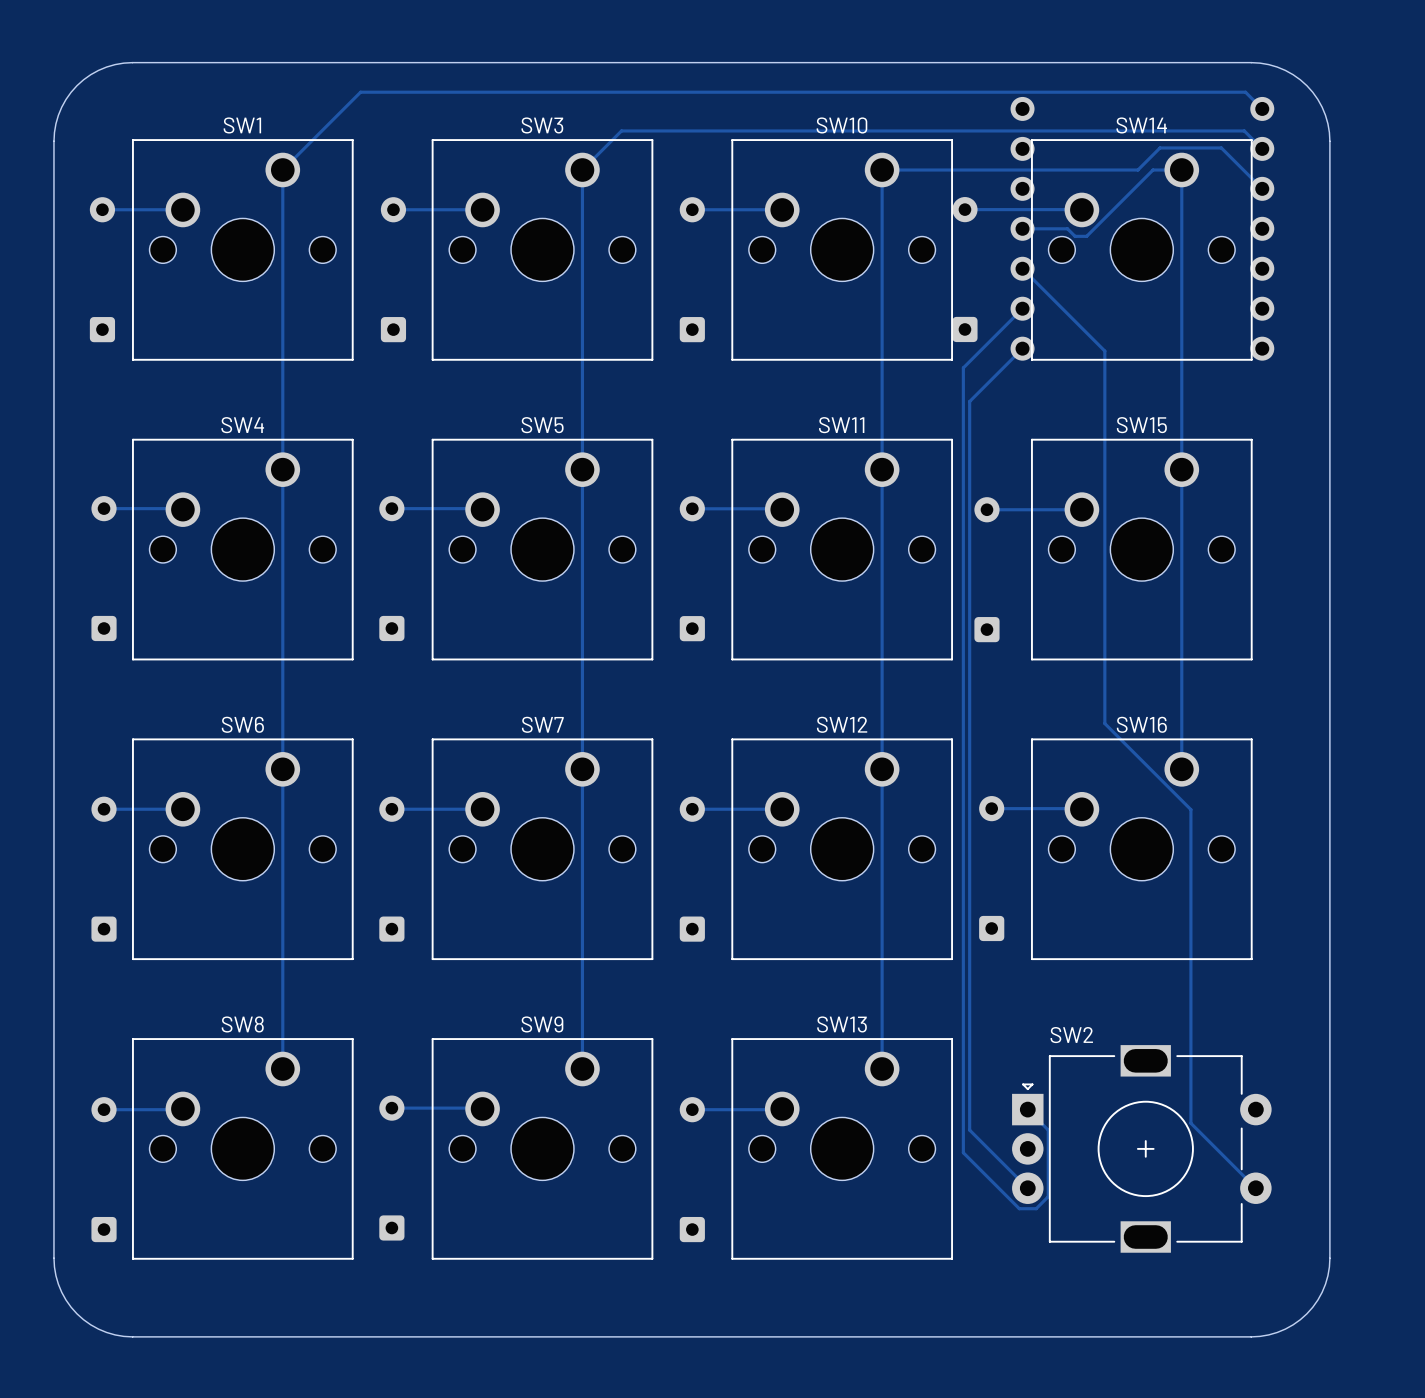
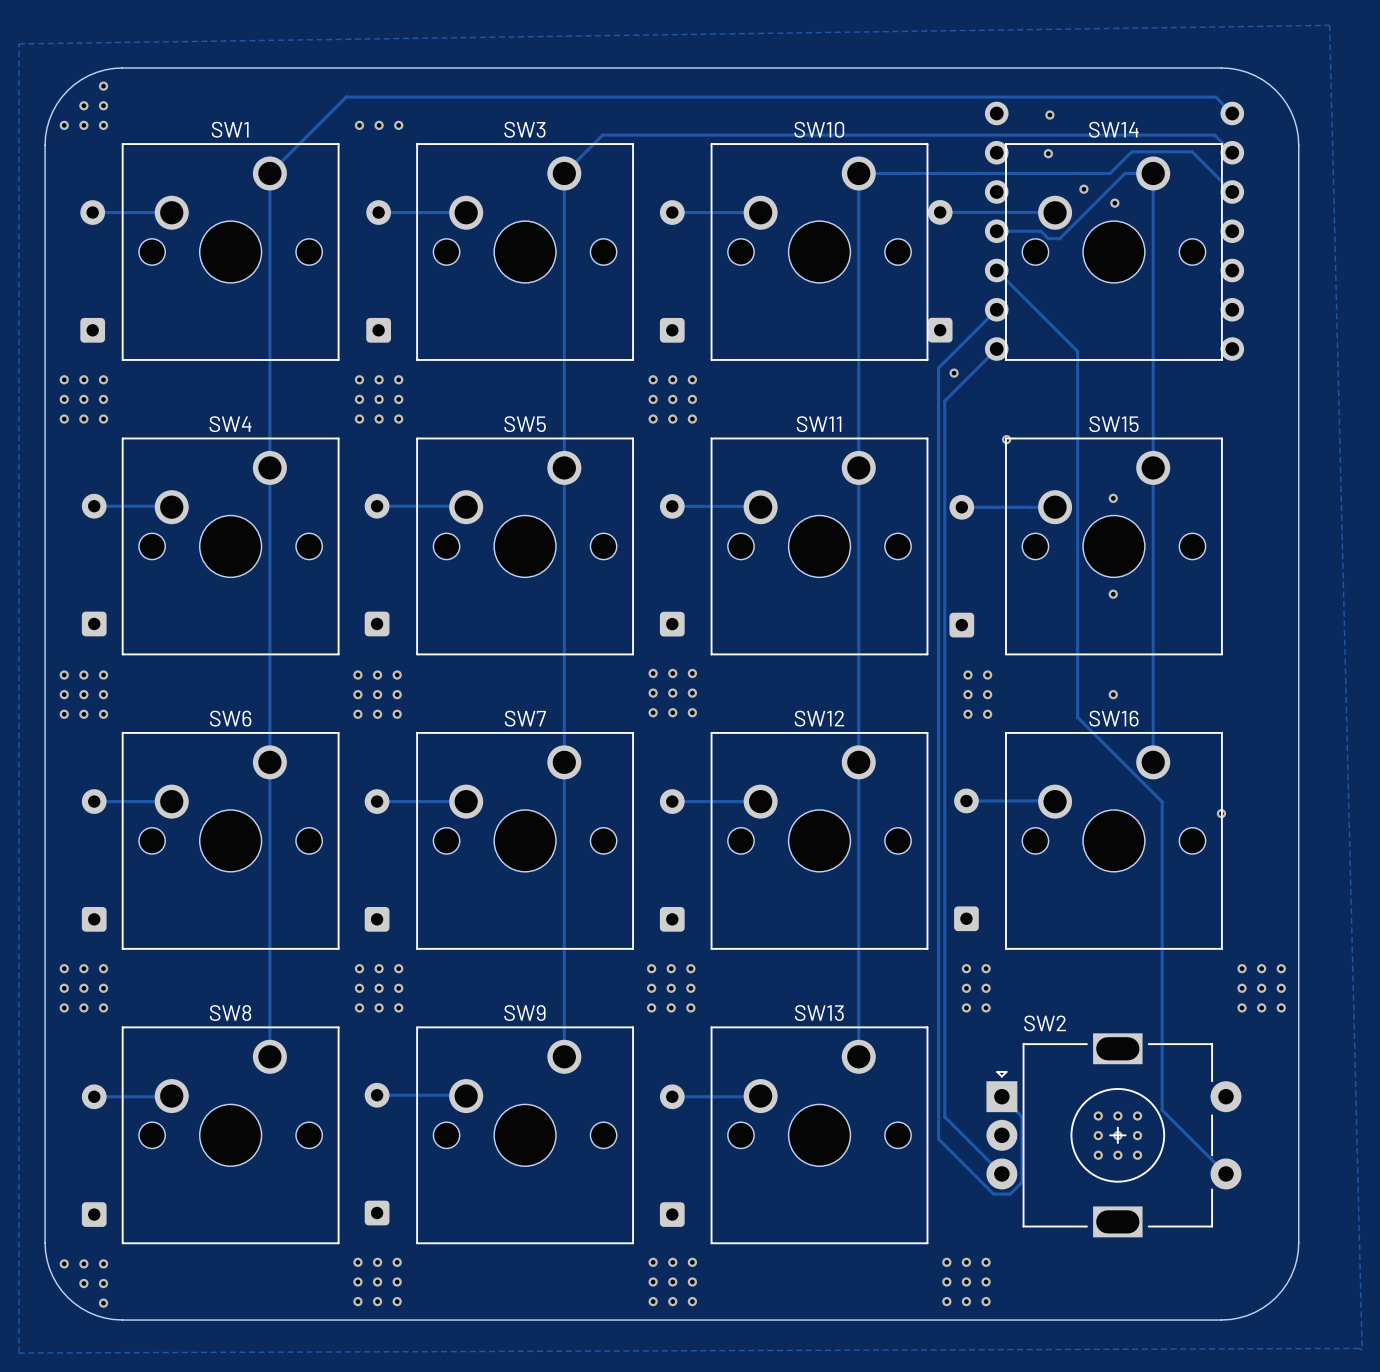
zone outline: none -> (1329, 25) (18, 43) (18, 1353) (1359, 1348) (1362, 1349) (1329, 25)
via: none -> (103, 86)
via: none -> (83, 105)
via: none -> (103, 105)
via: none -> (1049, 115)
via: none -> (64, 125)
via: none -> (83, 125)
via: none -> (103, 125)
via: none -> (359, 125)
via: none -> (379, 125)
via: none -> (398, 125)
via: none -> (1048, 153)
via: none -> (1083, 189)
via: none -> (1114, 203)
via: none -> (954, 373)
via: none -> (64, 379)
via: none -> (83, 379)
via: none -> (103, 379)
via: none -> (359, 379)
via: none -> (379, 379)
via: none -> (398, 379)
via: none -> (653, 379)
via: none -> (672, 379)
via: none -> (692, 379)
via: none -> (64, 399)
via: none -> (83, 399)
via: none -> (103, 399)
via: none -> (359, 399)
via: none -> (379, 399)
via: none -> (398, 399)
via: none -> (653, 399)
via: none -> (672, 399)
via: none -> (692, 399)
via: none -> (64, 419)
via: none -> (83, 419)
via: none -> (103, 419)
via: none -> (359, 419)
via: none -> (379, 419)
via: none -> (398, 419)
via: none -> (653, 419)
via: none -> (672, 419)
via: none -> (692, 419)
via: none -> (1006, 439)
via: none -> (1113, 498)
via: none -> (1113, 594)
via: none -> (653, 673)
via: none -> (672, 673)
via: none -> (692, 673)
via: none -> (64, 675)
via: none -> (83, 675)
via: none -> (103, 675)
via: none -> (357, 675)
via: none -> (377, 675)
via: none -> (397, 675)
via: none -> (967, 675)
via: none -> (987, 675)
via: none -> (653, 693)
via: none -> (672, 693)
via: none -> (692, 693)
via: none -> (64, 694)
via: none -> (83, 694)
via: none -> (103, 694)
via: none -> (357, 694)
via: none -> (377, 694)
via: none -> (397, 694)
via: none -> (967, 694)
via: none -> (987, 694)
via: none -> (1113, 694)
via: none -> (653, 712)
via: none -> (672, 712)
via: none -> (692, 712)
via: none -> (64, 714)
via: none -> (83, 714)
via: none -> (103, 714)
via: none -> (357, 714)
via: none -> (377, 714)
via: none -> (397, 714)
via: none -> (967, 714)
via: none -> (987, 714)
via: none -> (1221, 813)
via: none -> (64, 968)
via: none -> (83, 968)
via: none -> (103, 968)
via: none -> (359, 968)
via: none -> (379, 968)
via: none -> (398, 968)
via: none -> (651, 968)
via: none -> (671, 968)
via: none -> (690, 968)
via: none -> (966, 968)
via: none -> (986, 968)
via: none -> (1242, 968)
via: none -> (1261, 968)
via: none -> (1281, 968)
via: none -> (64, 988)
via: none -> (83, 988)
via: none -> (103, 988)
via: none -> (359, 988)
via: none -> (379, 988)
via: none -> (398, 988)
via: none -> (651, 988)
via: none -> (671, 988)
via: none -> (690, 988)
via: none -> (966, 988)
via: none -> (986, 988)
via: none -> (1242, 988)
via: none -> (1261, 988)
via: none -> (1281, 988)
via: none -> (64, 1007)
via: none -> (83, 1007)
via: none -> (103, 1007)
via: none -> (359, 1007)
via: none -> (379, 1007)
via: none -> (398, 1007)
via: none -> (651, 1007)
via: none -> (671, 1007)
via: none -> (690, 1007)
via: none -> (966, 1007)
via: none -> (986, 1007)
via: none -> (1242, 1007)
via: none -> (1261, 1007)
via: none -> (1281, 1007)
via: none -> (1098, 1115)
via: none -> (1117, 1115)
via: none -> (1137, 1115)
via: none -> (1098, 1135)
via: none -> (1117, 1135)
via: none -> (1137, 1135)
via: none -> (1098, 1155)
via: none -> (1117, 1155)
via: none -> (1137, 1155)
via: none -> (357, 1262)
via: none -> (377, 1262)
via: none -> (397, 1262)
via: none -> (653, 1262)
via: none -> (672, 1262)
via: none -> (692, 1262)
via: none -> (946, 1262)
via: none -> (966, 1262)
via: none -> (986, 1262)
via: none -> (64, 1263)
via: none -> (83, 1263)
via: none -> (103, 1263)
via: none -> (357, 1281)
via: none -> (377, 1281)
via: none -> (397, 1281)
via: none -> (653, 1281)
via: none -> (672, 1281)
via: none -> (692, 1281)
via: none -> (946, 1281)
via: none -> (966, 1281)
via: none -> (986, 1281)
via: none -> (83, 1283)
via: none -> (103, 1283)
via: none -> (357, 1301)
via: none -> (377, 1301)
via: none -> (397, 1301)
via: none -> (653, 1301)
via: none -> (672, 1301)
via: none -> (692, 1301)
via: none -> (946, 1301)
via: none -> (966, 1301)
via: none -> (986, 1301)
via: none -> (103, 1303)

